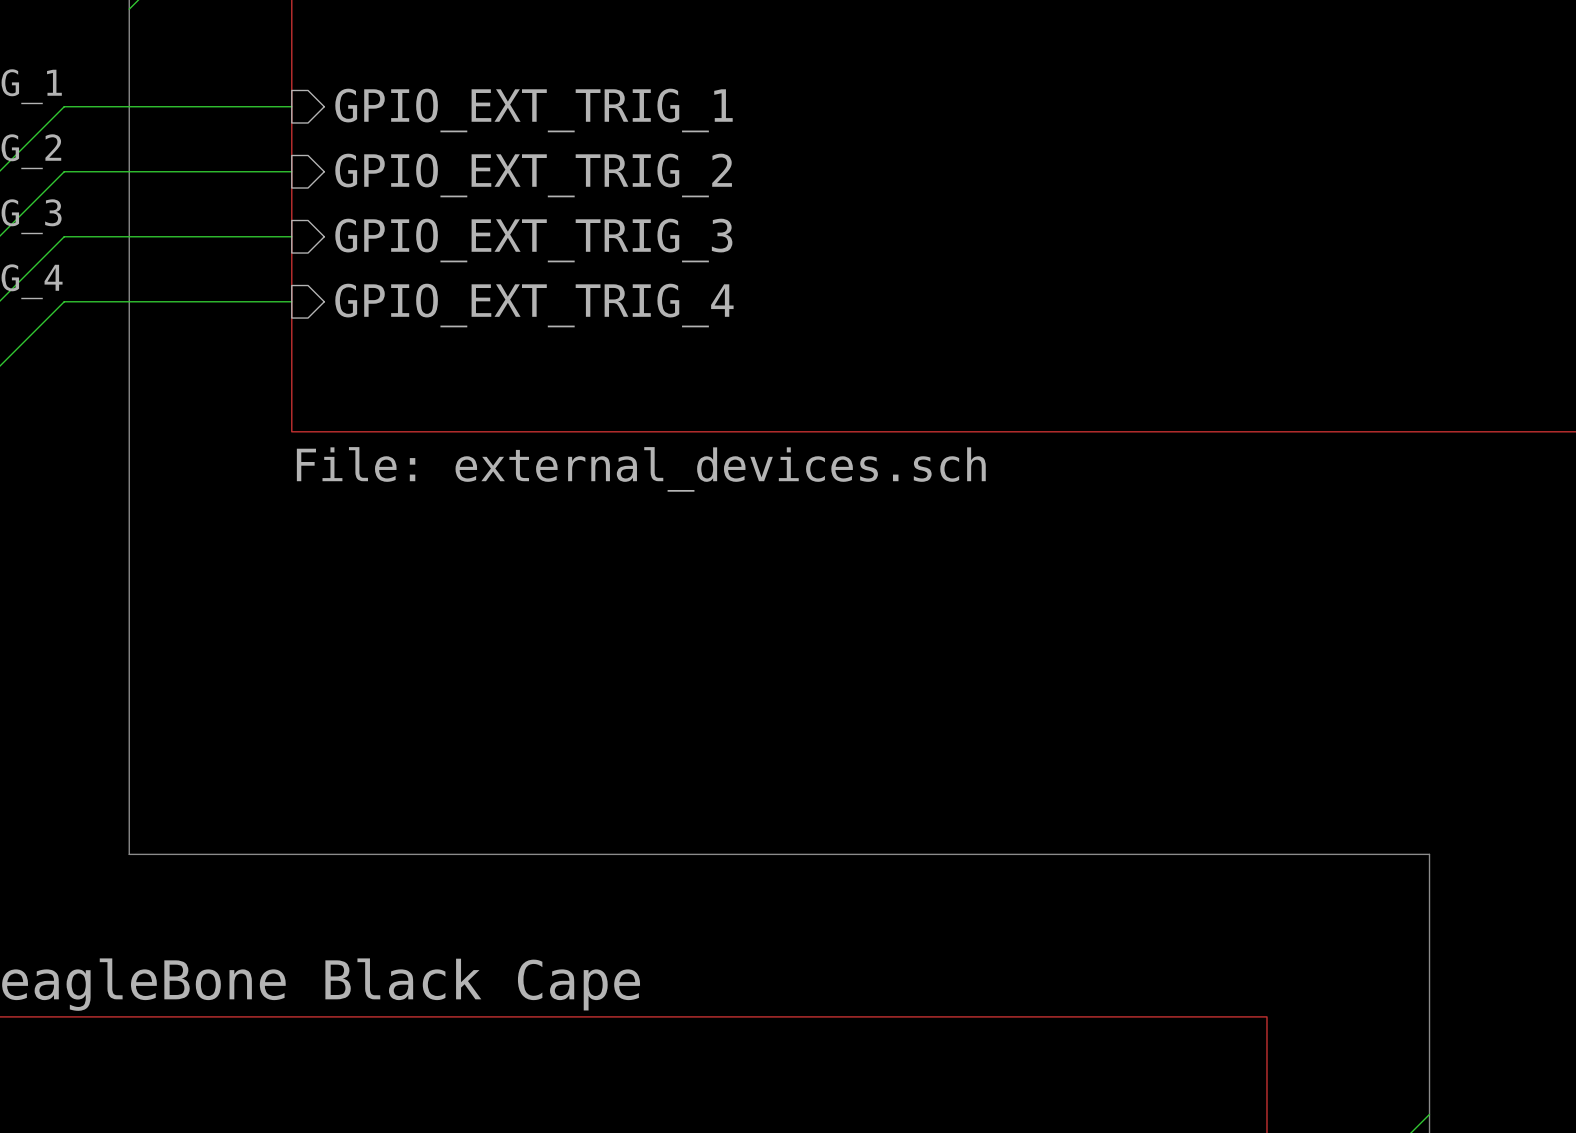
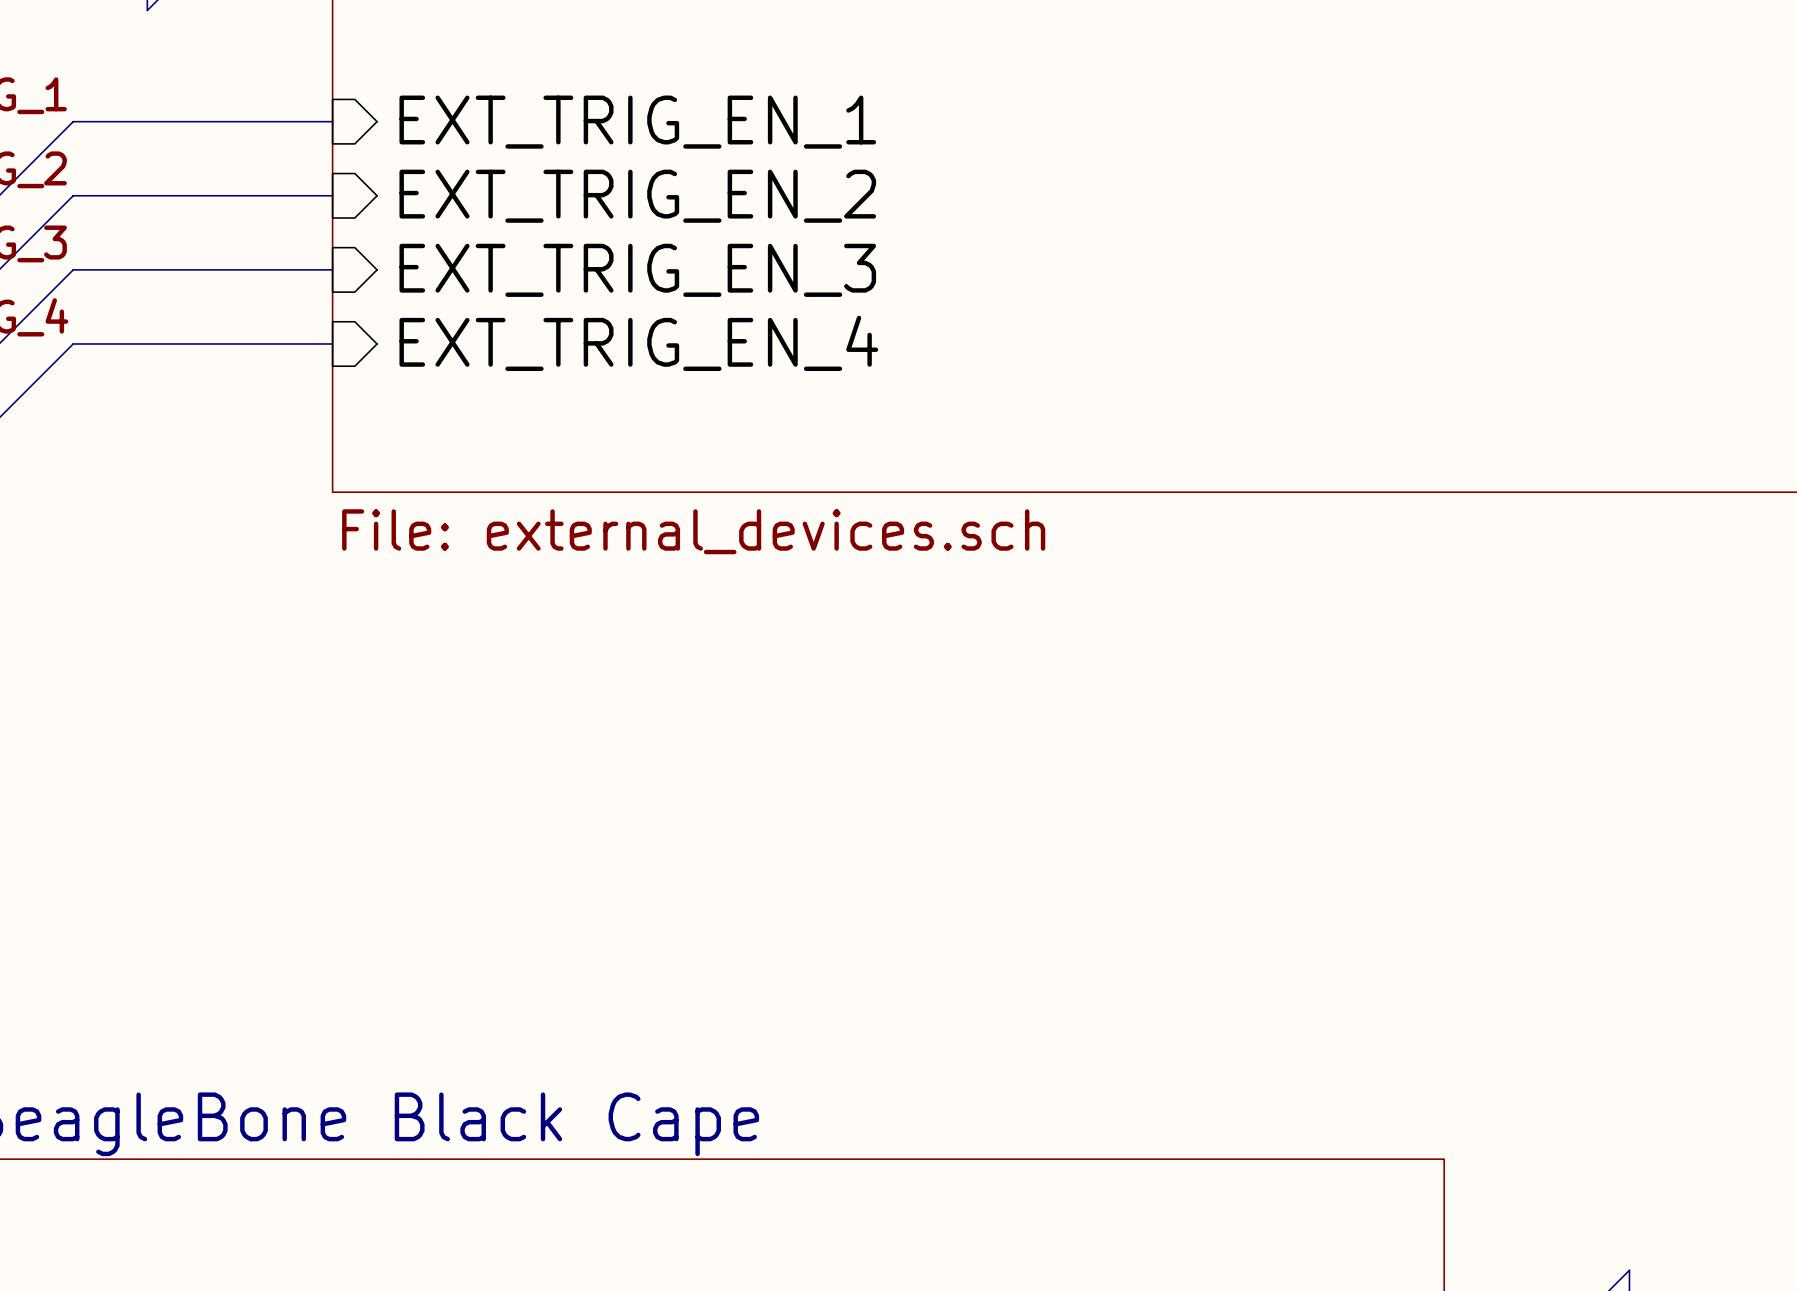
bus: (129, 9) (129, 854) (1429, 854) (1429, 1114) -> none
sheet pin: GPIO_EXT_TRIG_1 (534, 110) -> EXT_TRIG_EN_1 (637, 122)
sheet pin: GPIO_EXT_TRIG_2 (533, 175) -> EXT_TRIG_EN_2 (637, 196)
sheet pin: GPIO_EXT_TRIG_3 (533, 240) -> EXT_TRIG_EN_3 (637, 270)
sheet pin: GPIO_EXT_TRIG_4 (534, 305) -> EXT_TRIG_EN_4 (638, 343)

